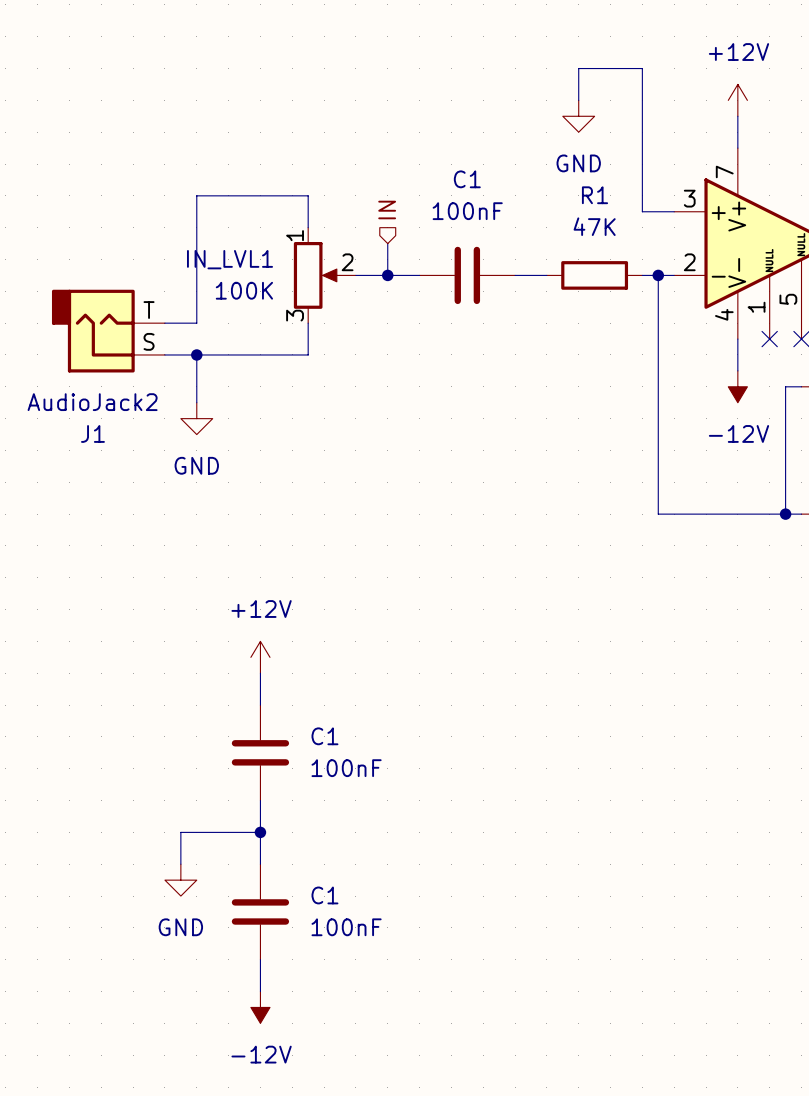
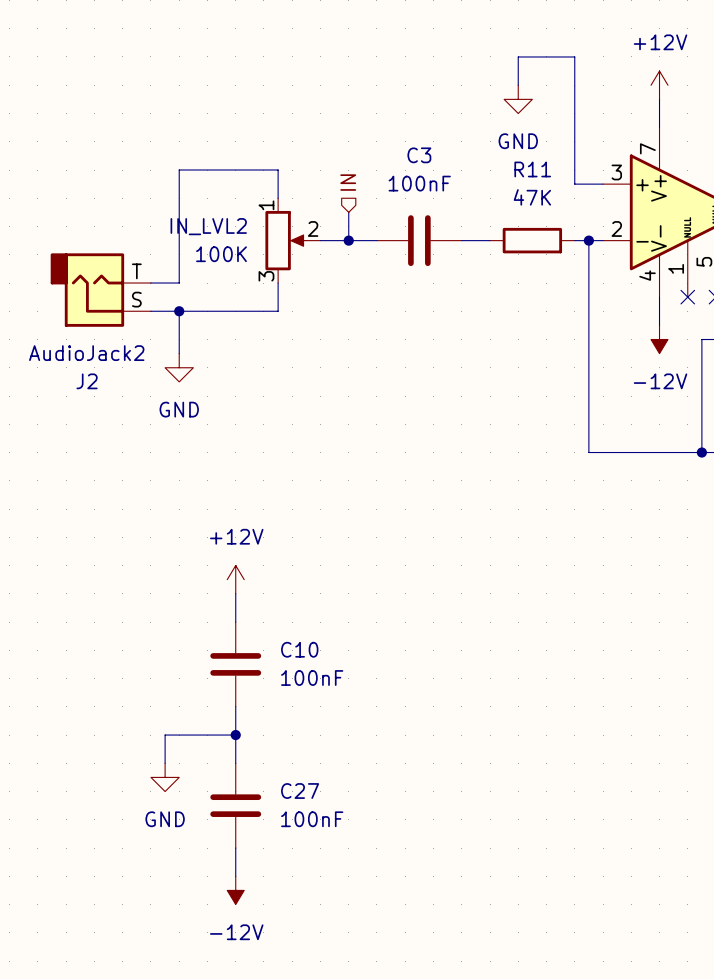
C1 name: C1 (467, 179) -> C3 (419, 155)
R1 name: R1 (595, 195) -> R11 (532, 169)
IN_LVL1 name: IN_LVL1 (230, 259) -> IN_LVL2 (208, 226)
J1 name: J1 (92, 433) -> J2 (87, 381)
C1 name: C1 (324, 736) -> C10 (299, 649)
C1 name: C1 (324, 895) -> C27 (300, 791)

